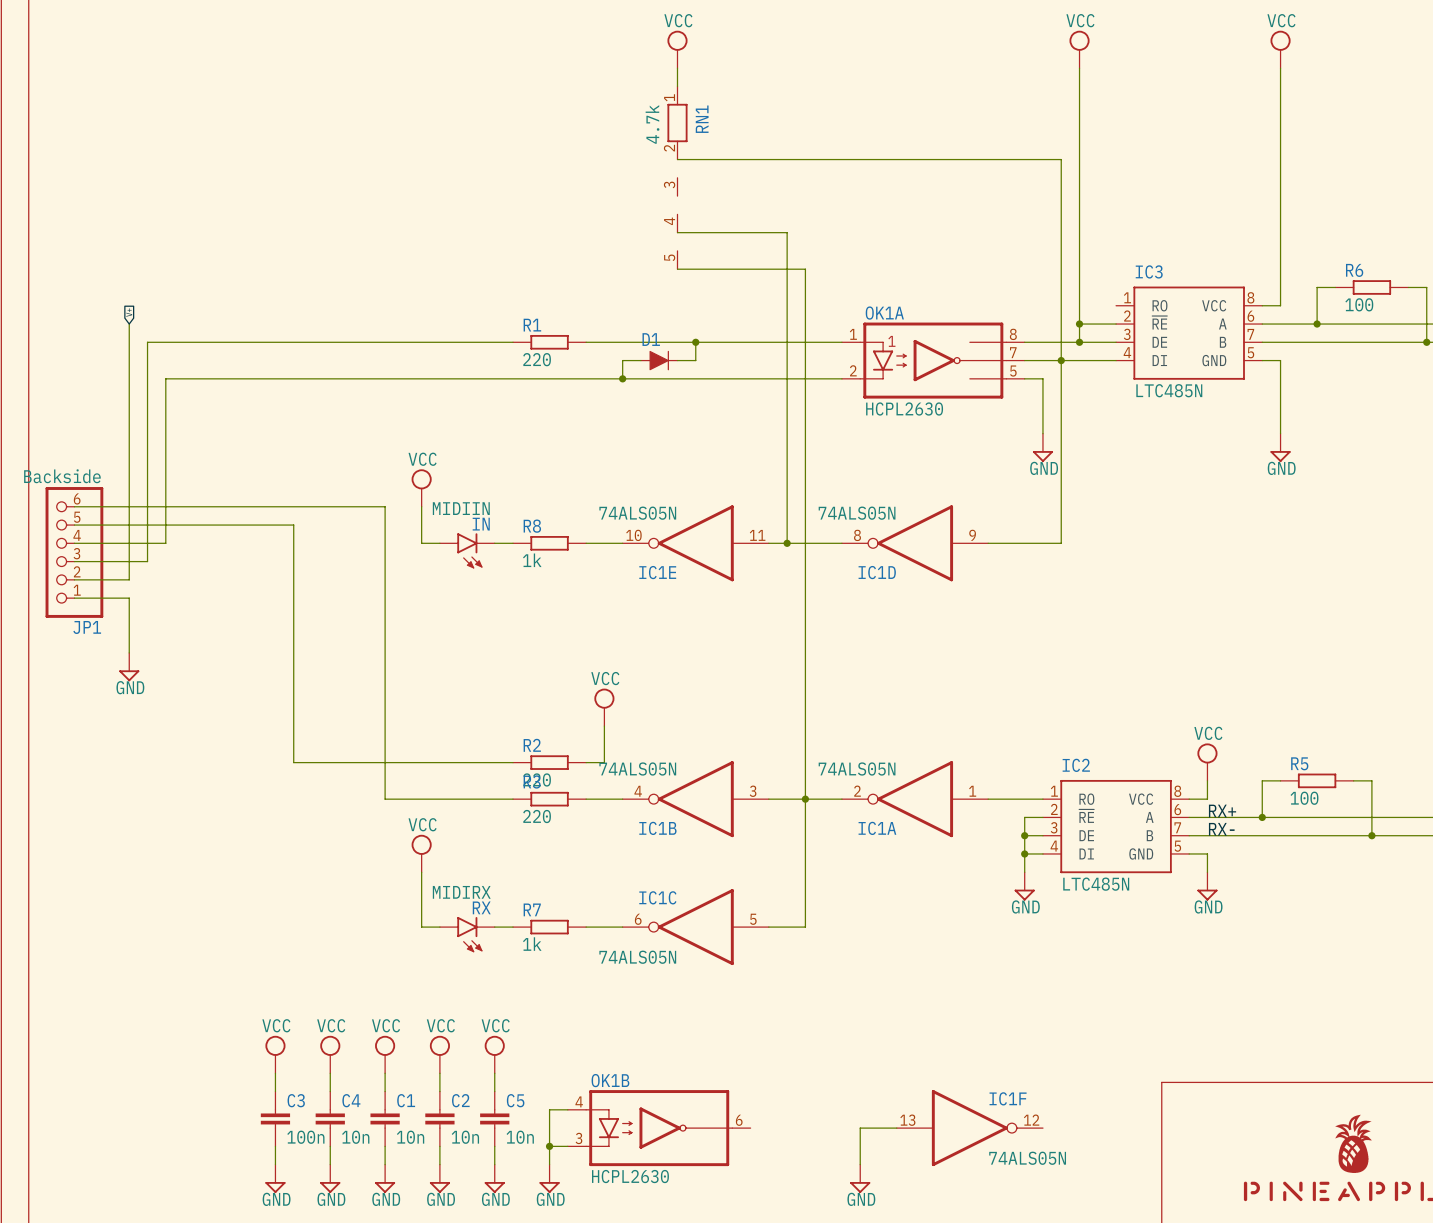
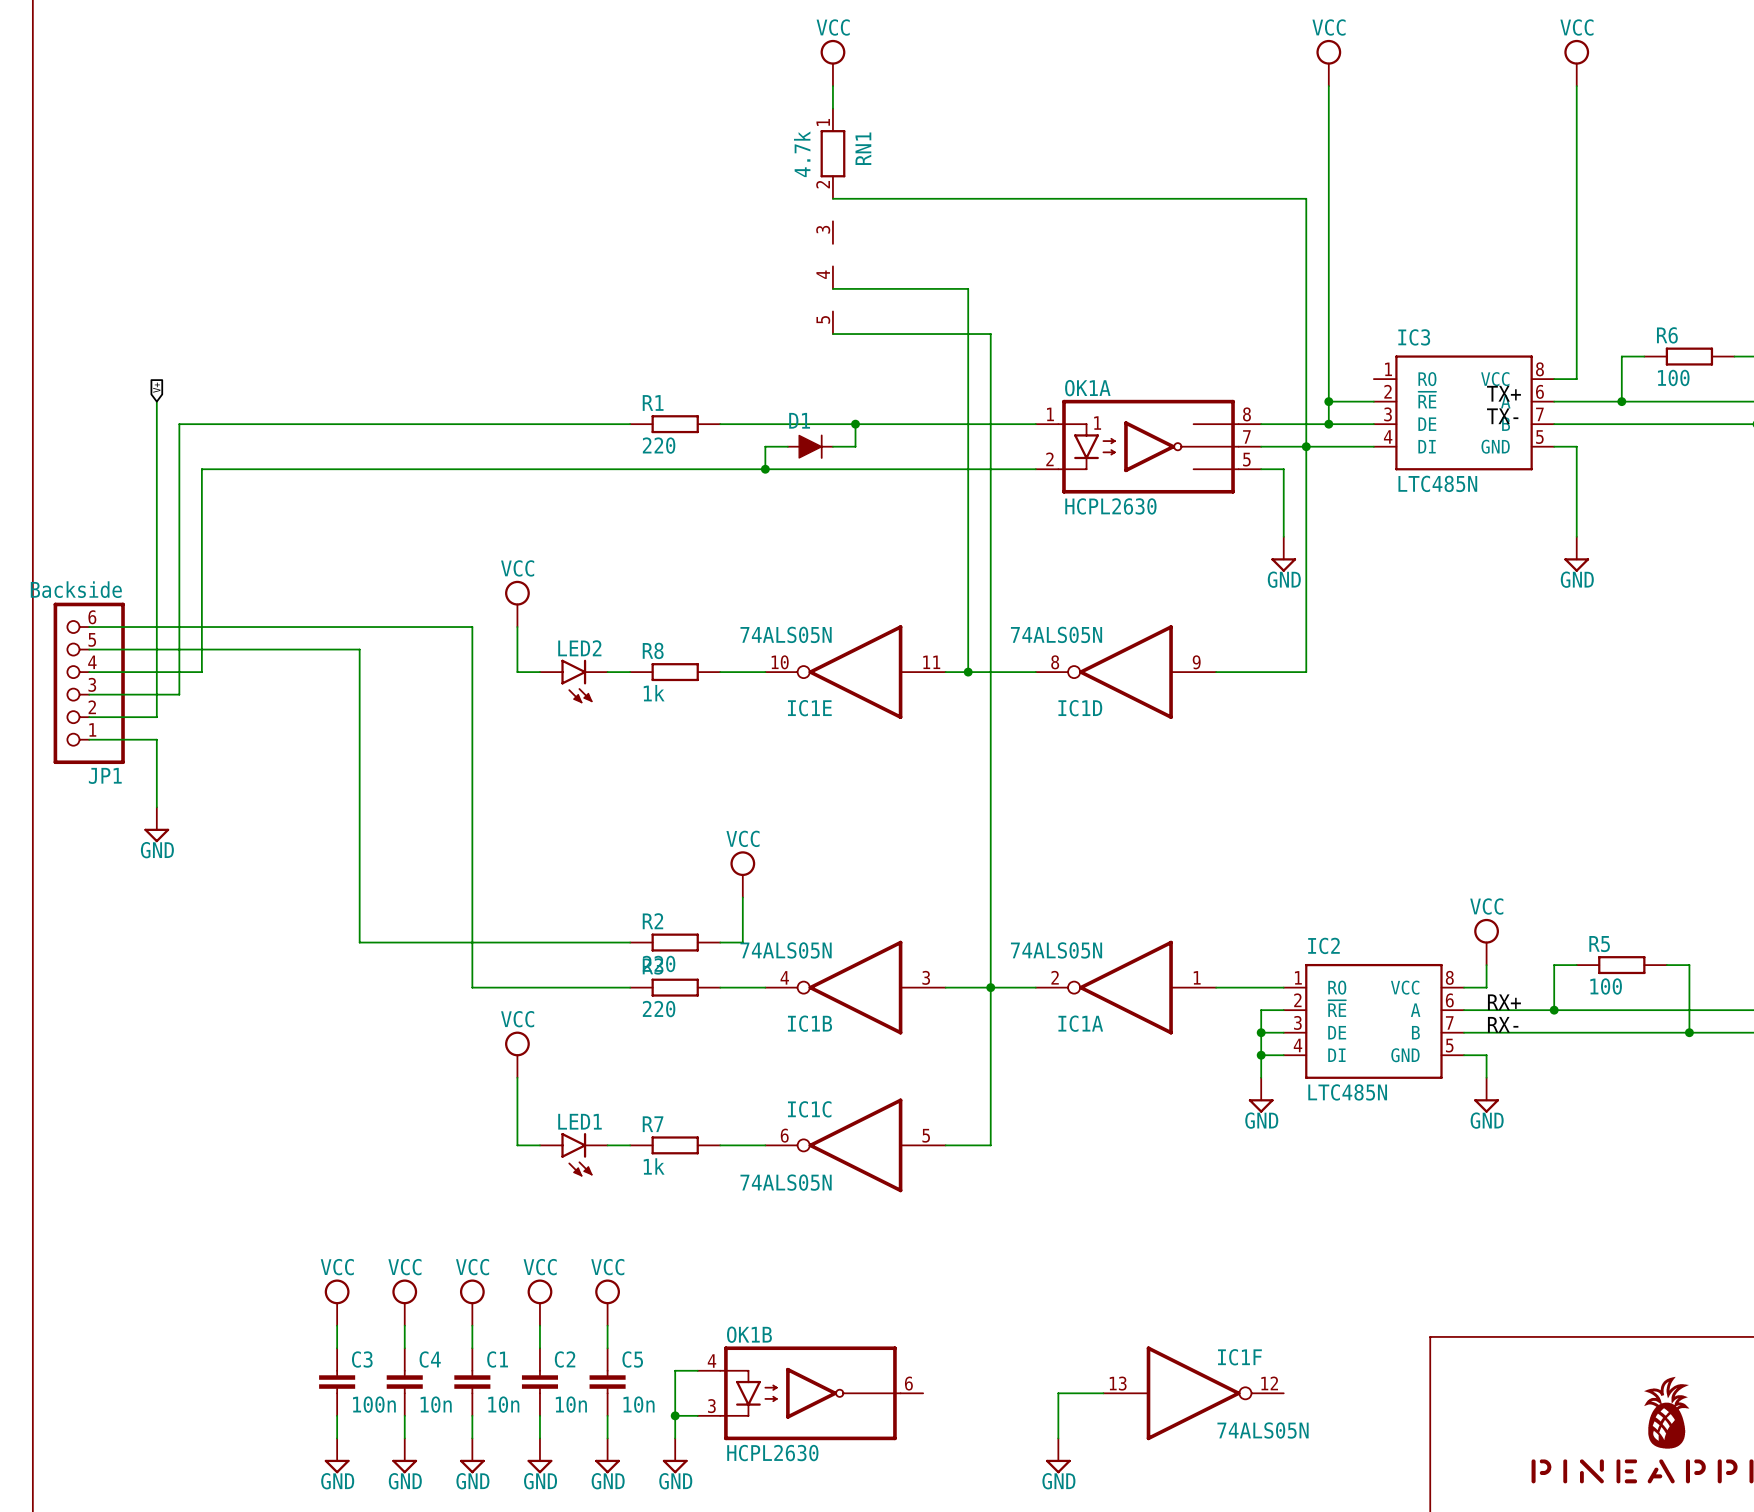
label: none -> TX+ (1503, 393)
label: none -> TX- (1502, 416)
IN value: MIDIIN (461, 508) -> none
IN name: IN (481, 524) -> LED2 (579, 648)
RX value: MIDIRX (461, 892) -> none
RX name: RX (481, 907) -> LED1 (579, 1121)

